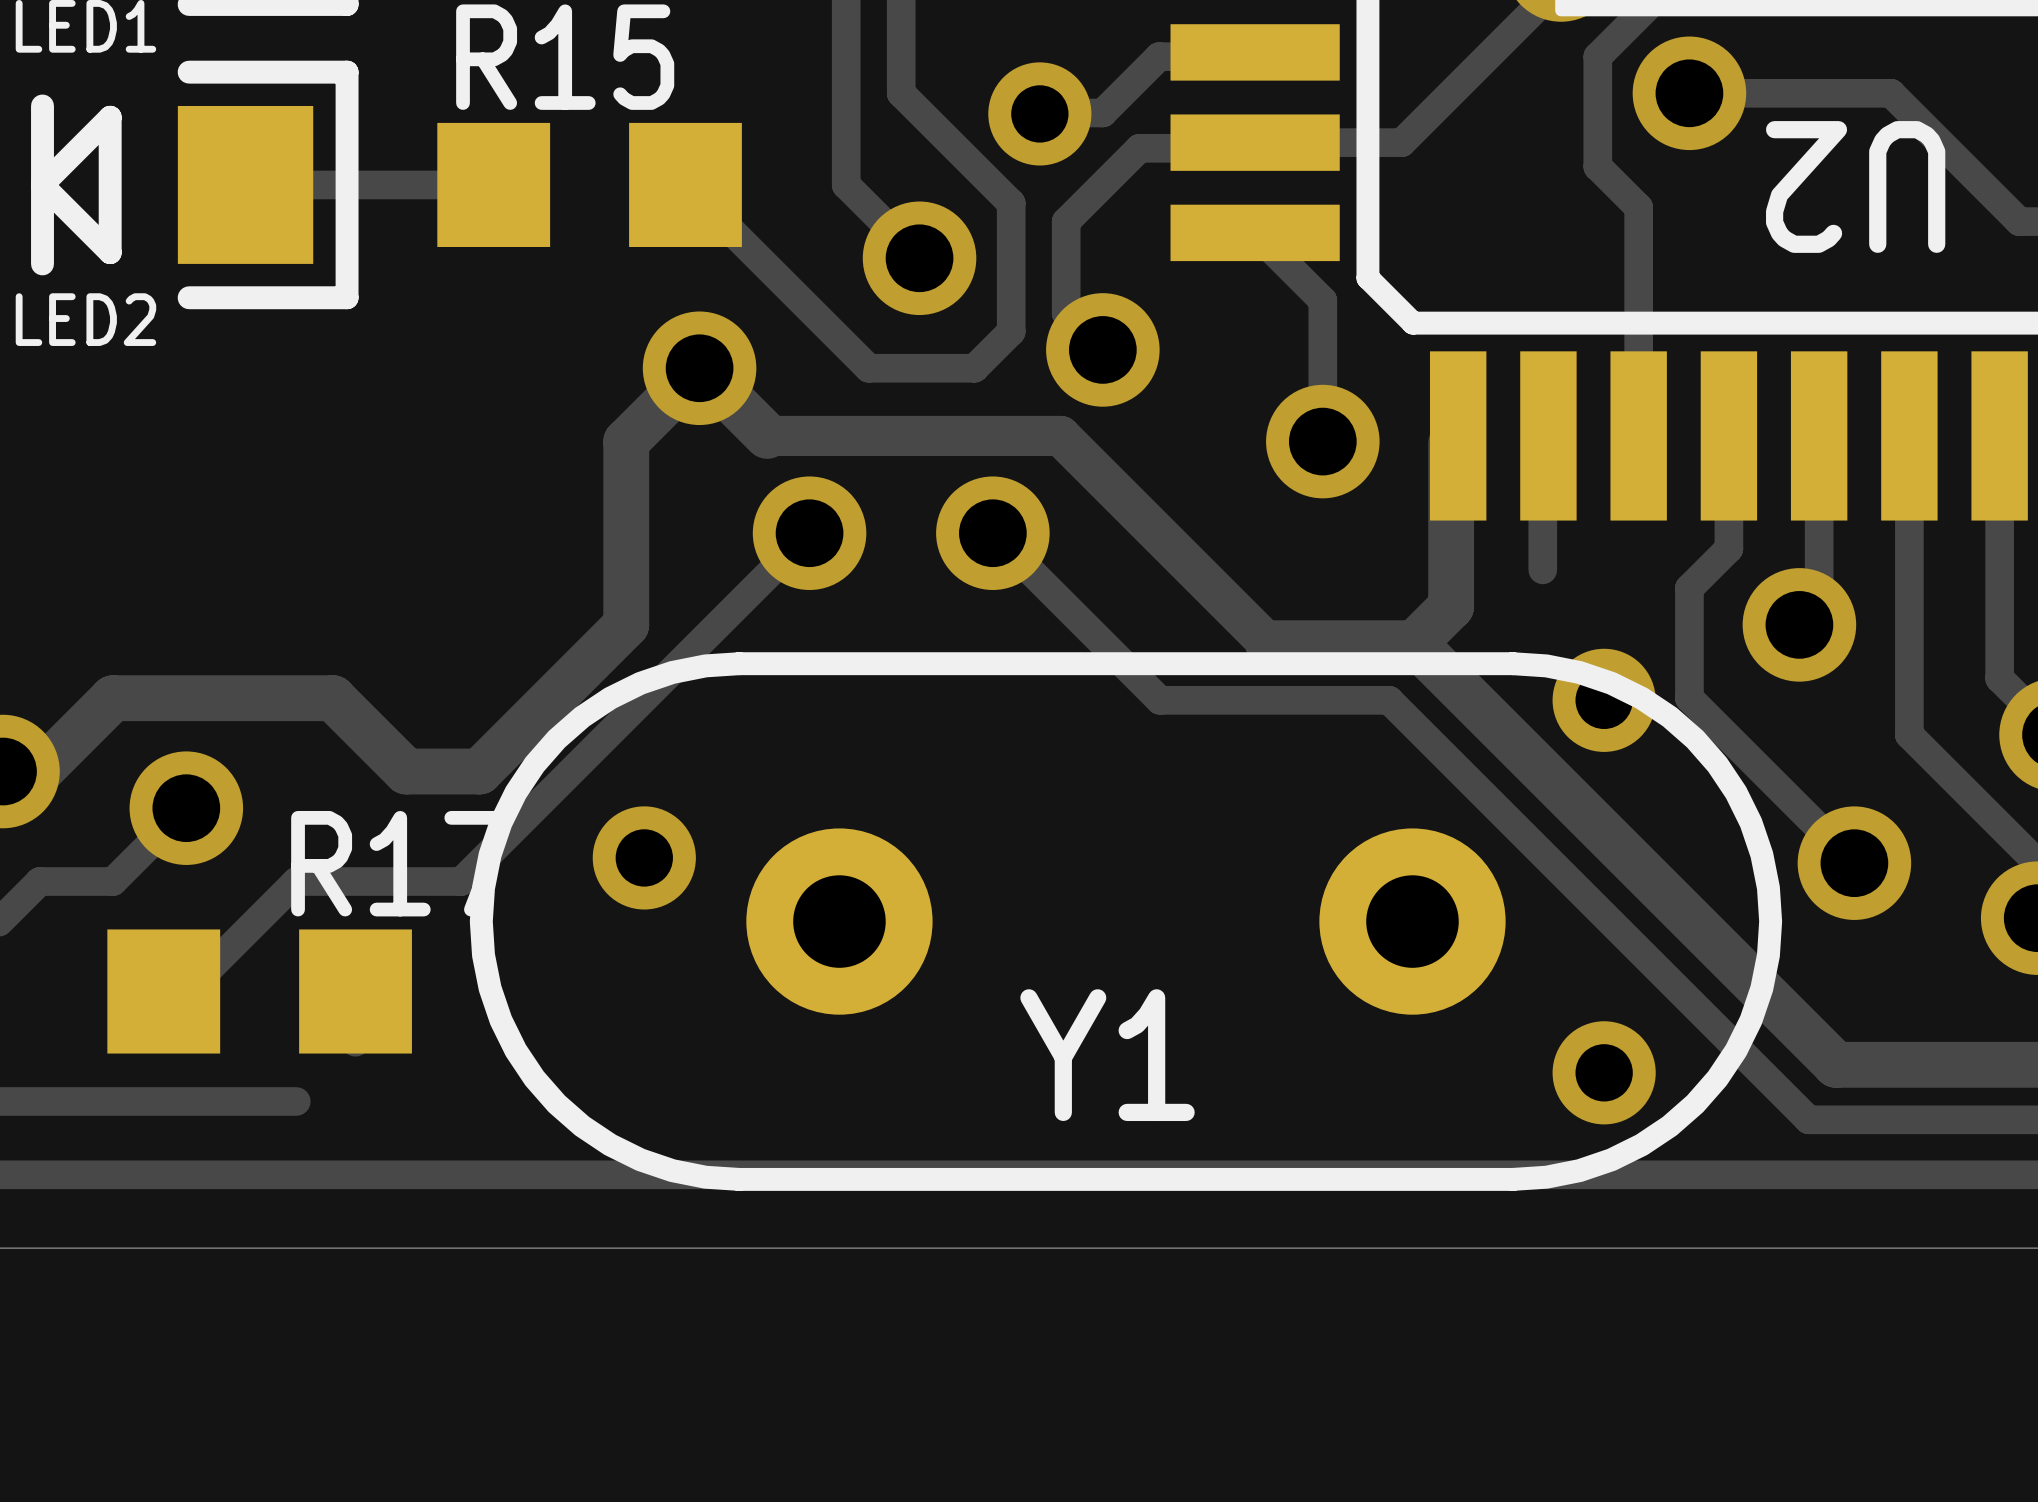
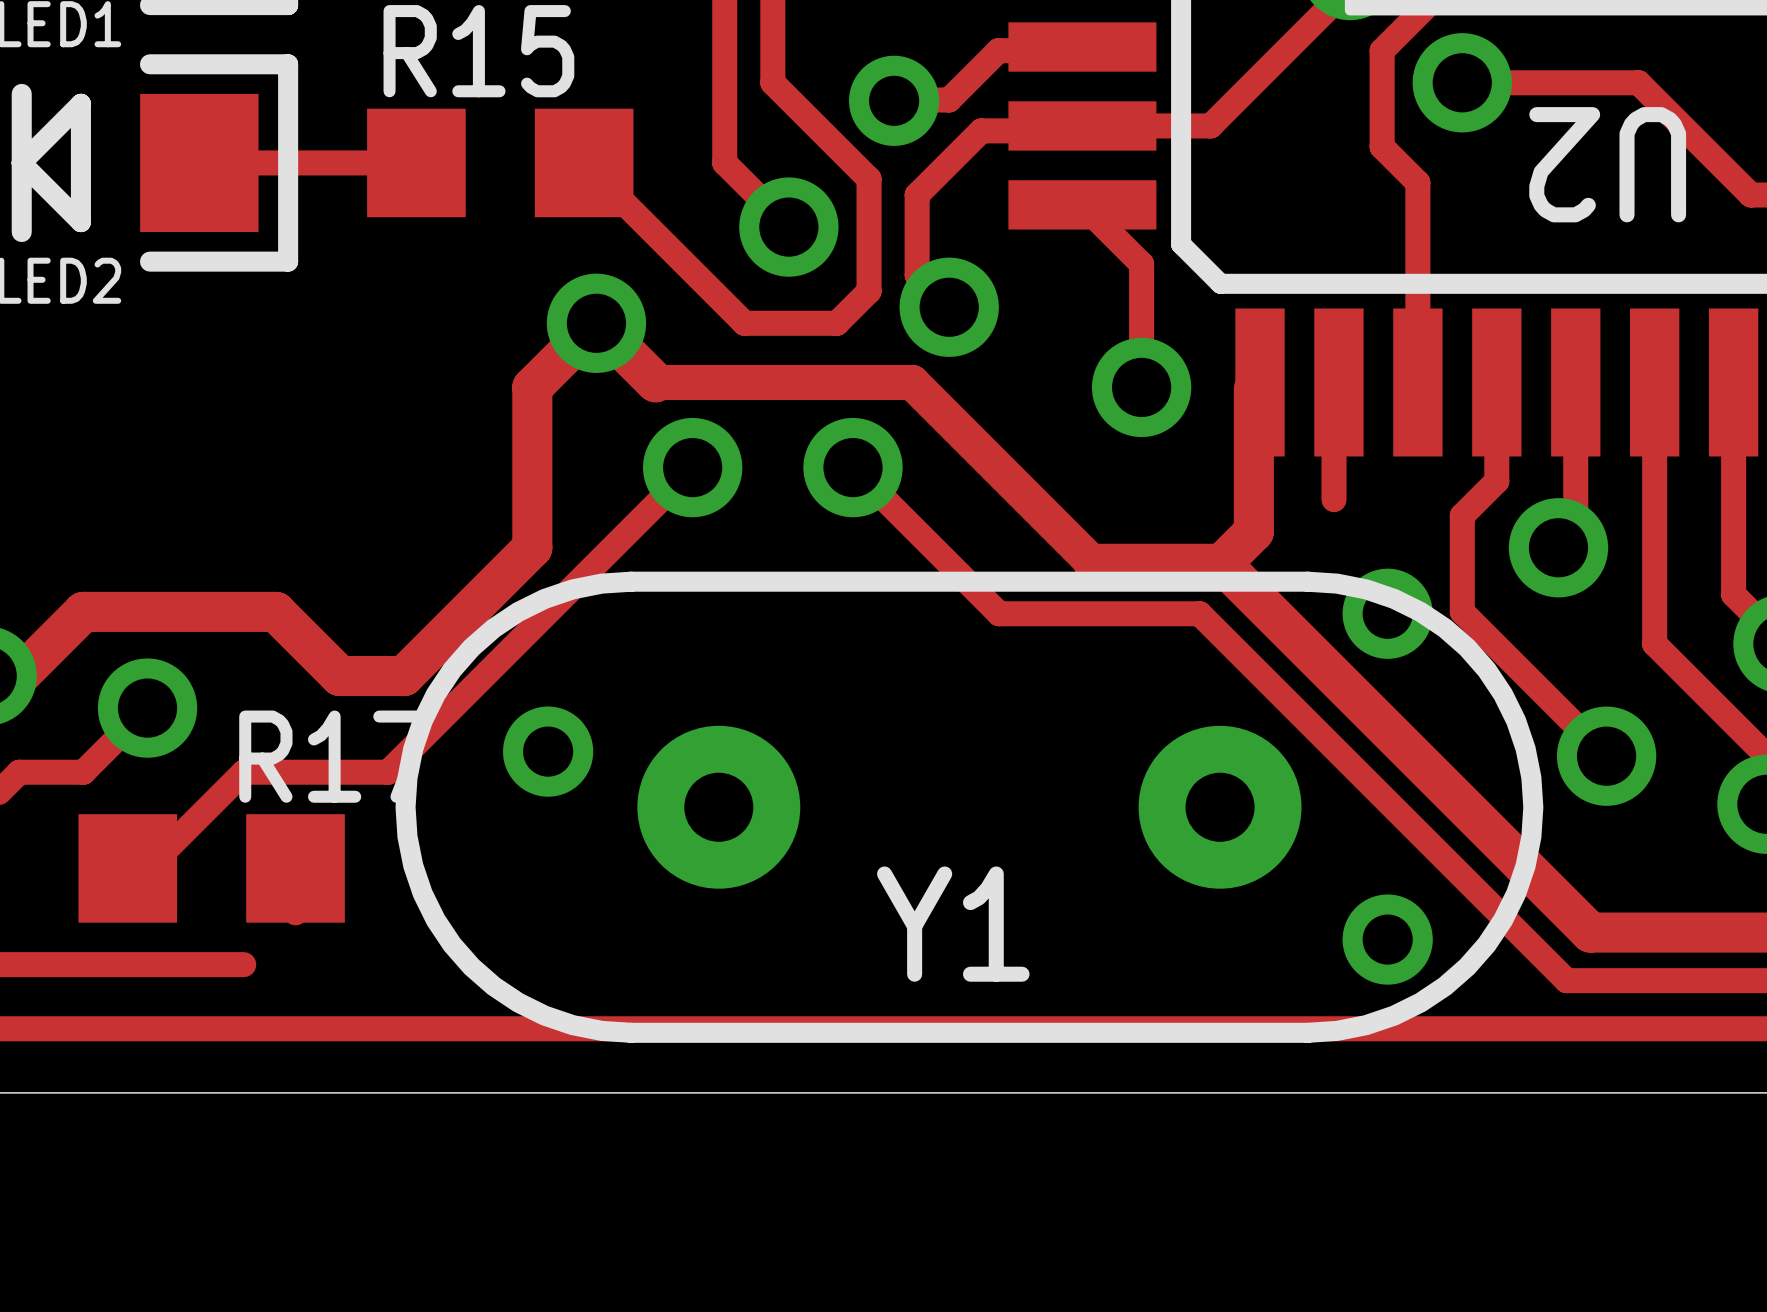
Y1 footprint: [469, 652, 1783, 1191] -> [395, 571, 1544, 1043]

